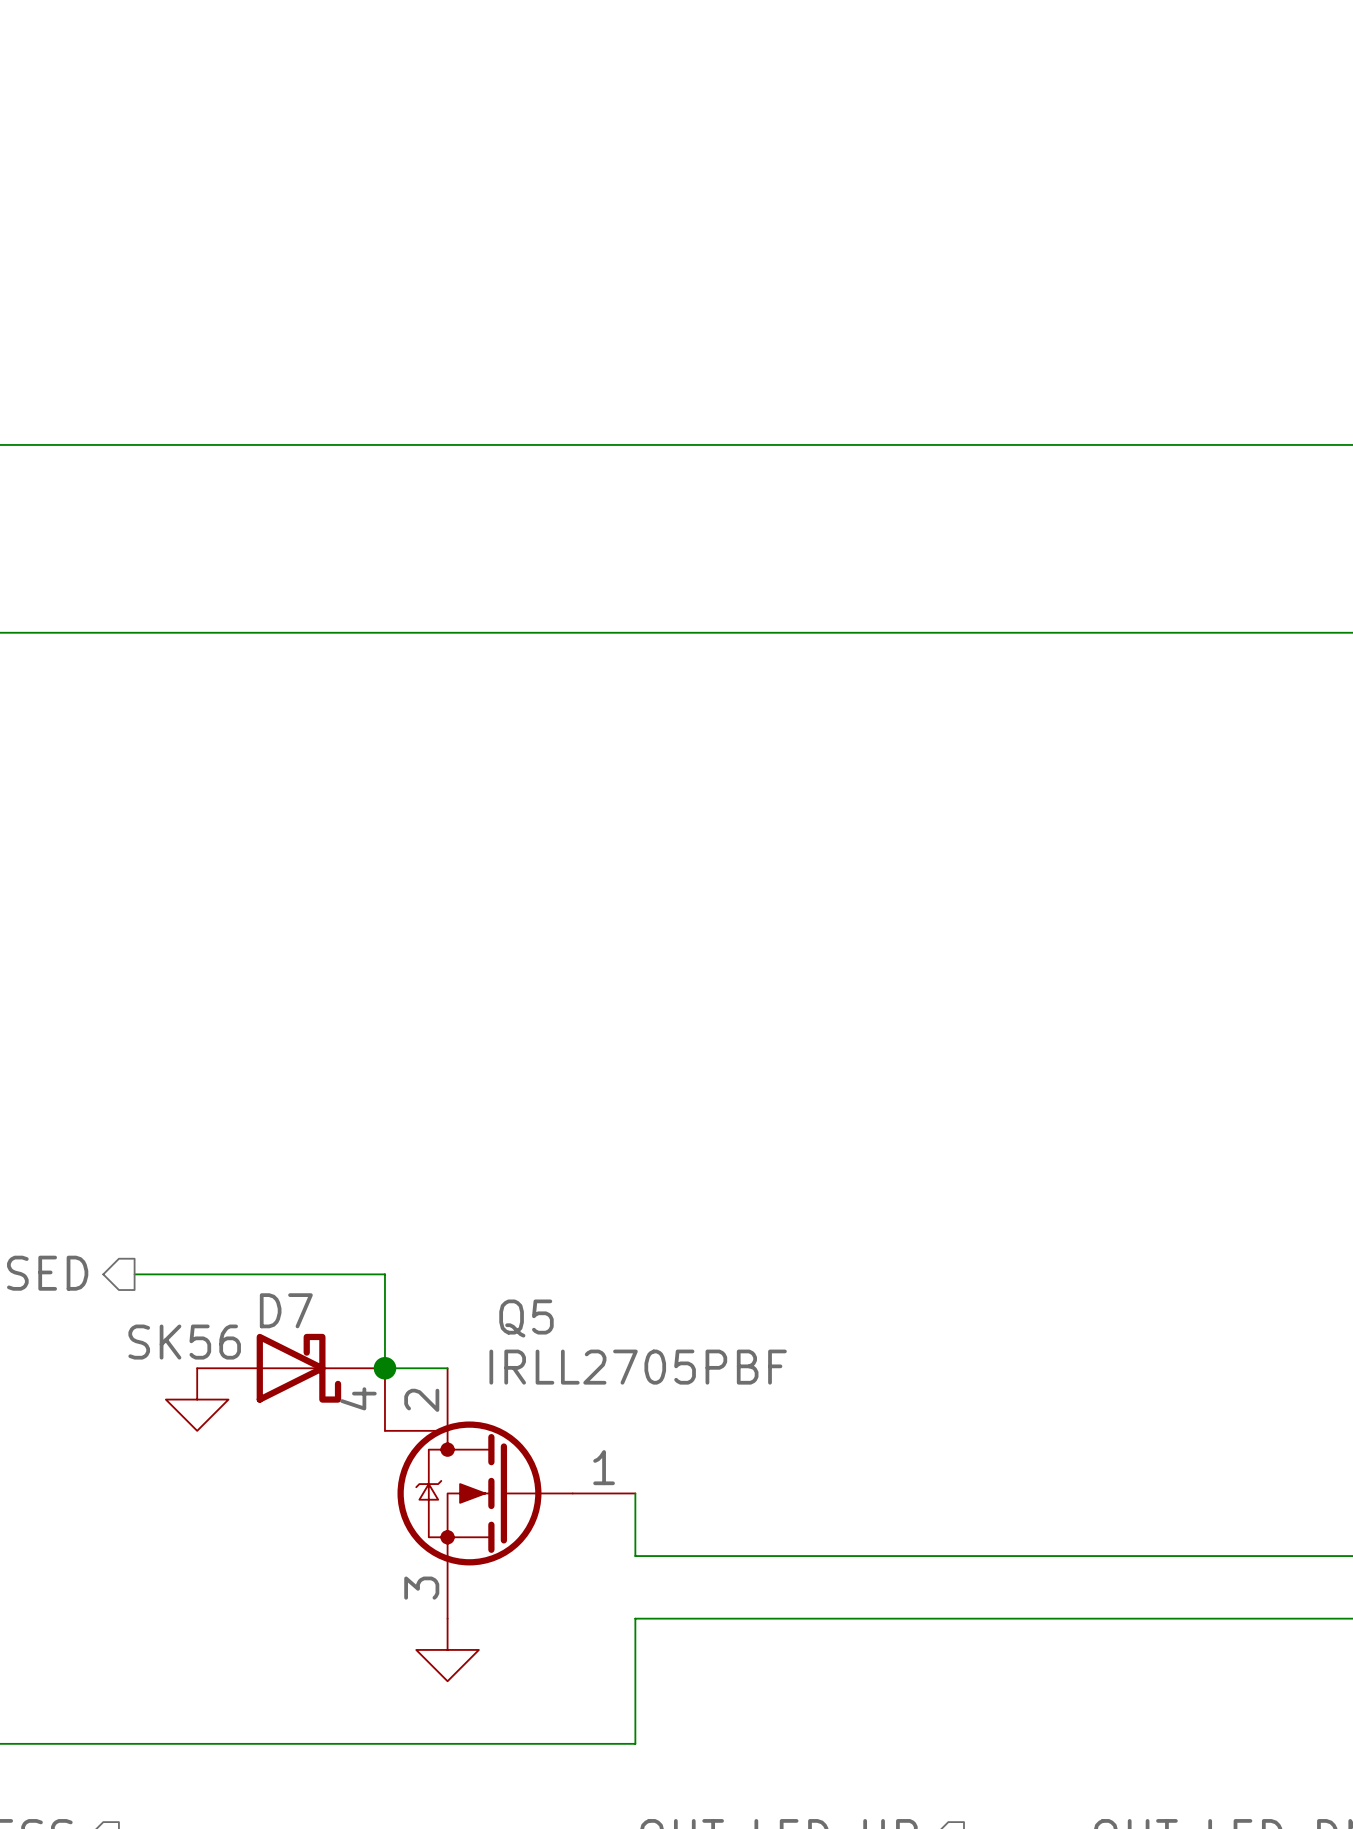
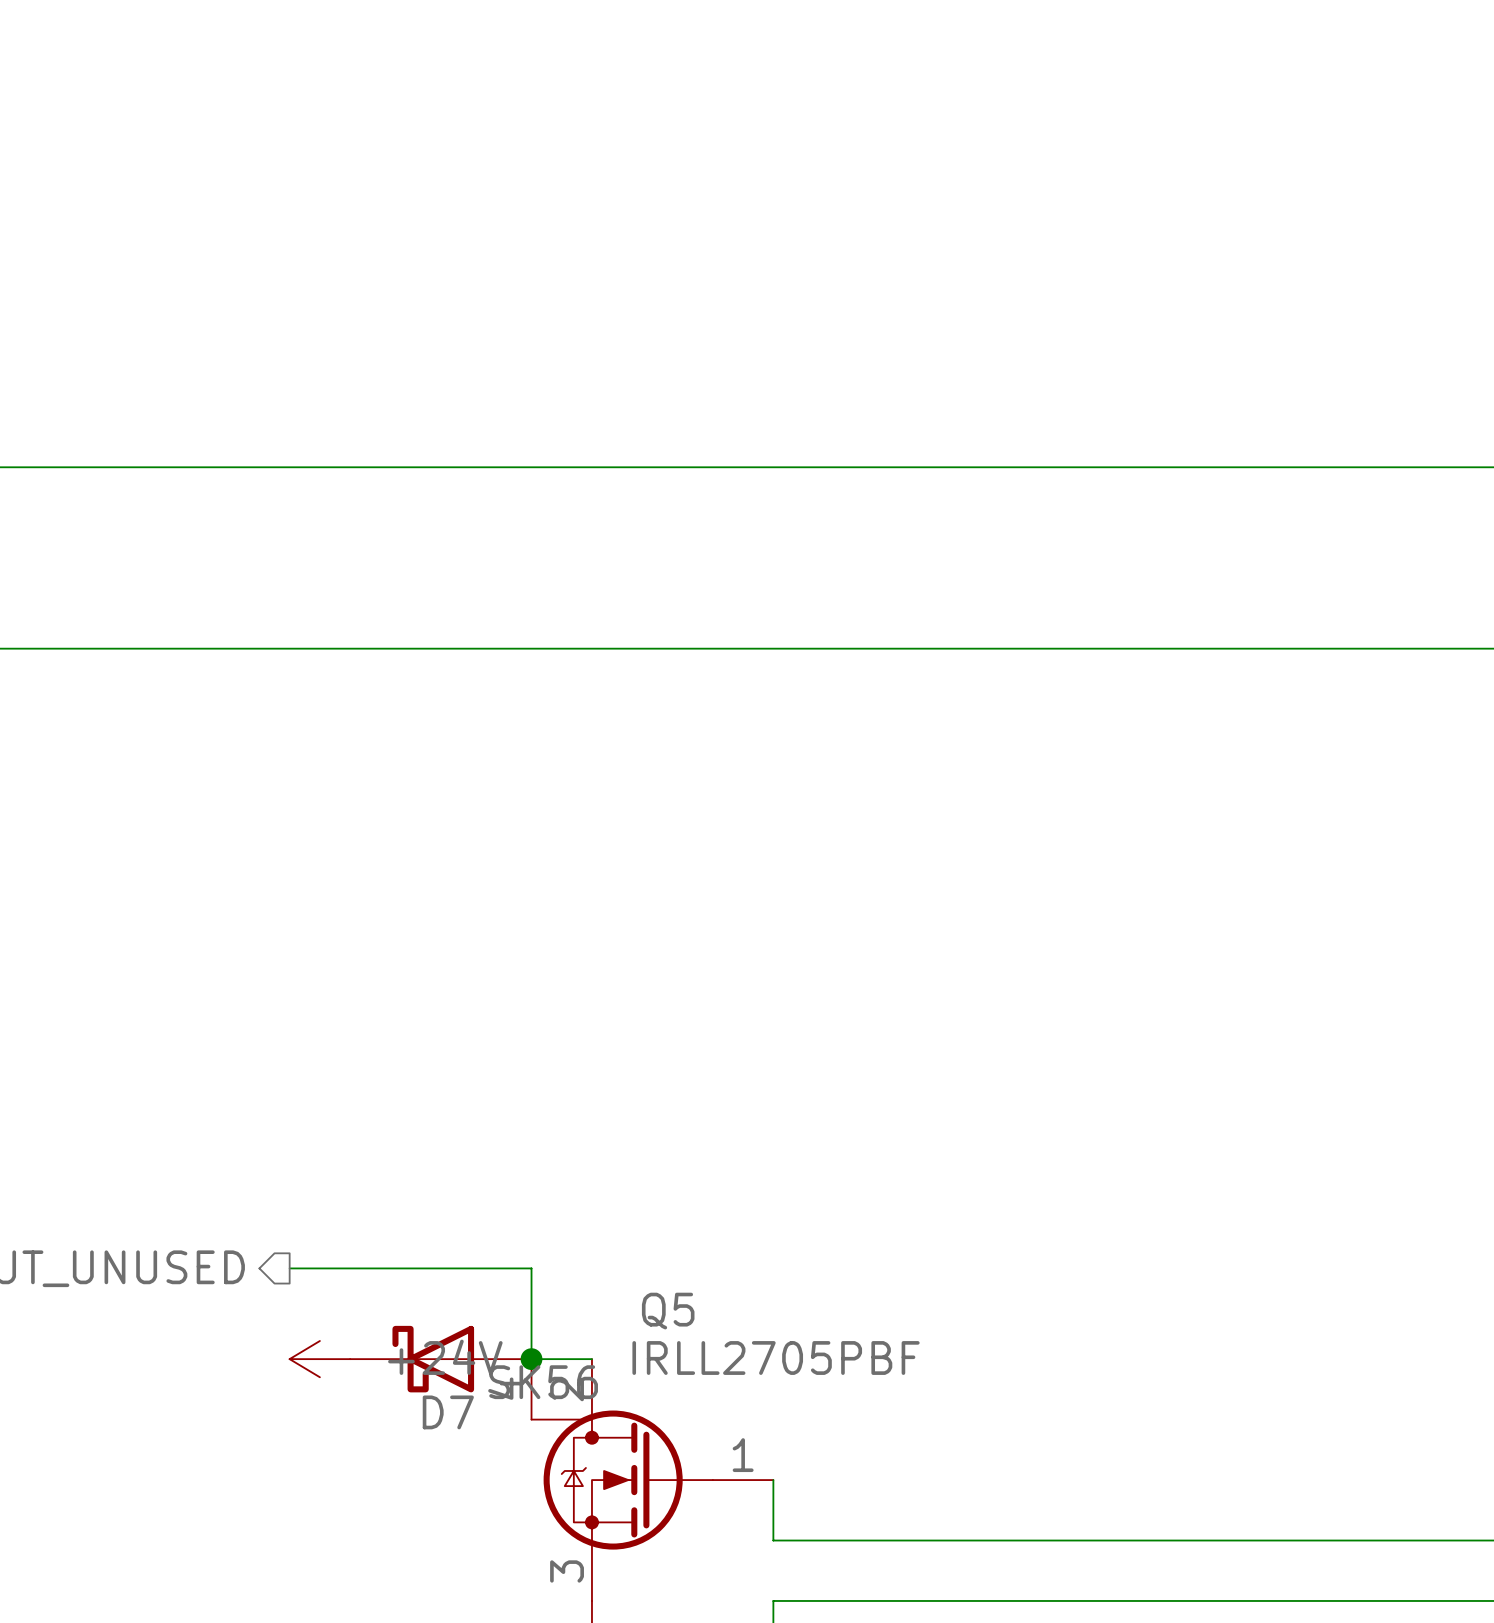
power symbol: none -> +24V (319, 1359)
D7 rotation: 0° (298, 1368) -> 180° (433, 1359)
power symbol: (197, 1399) -> none

